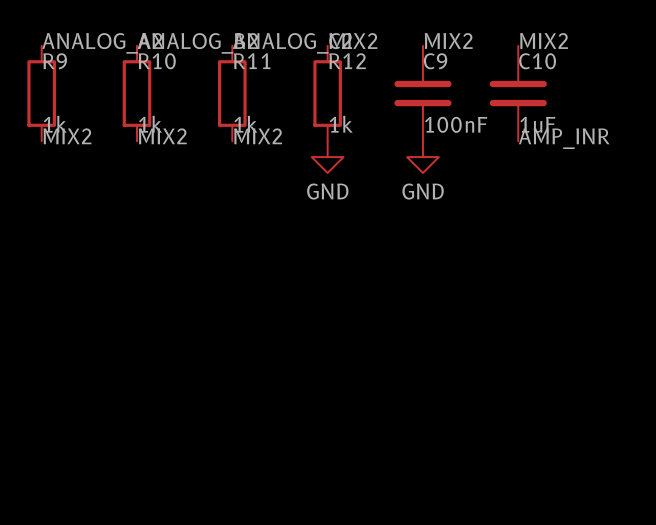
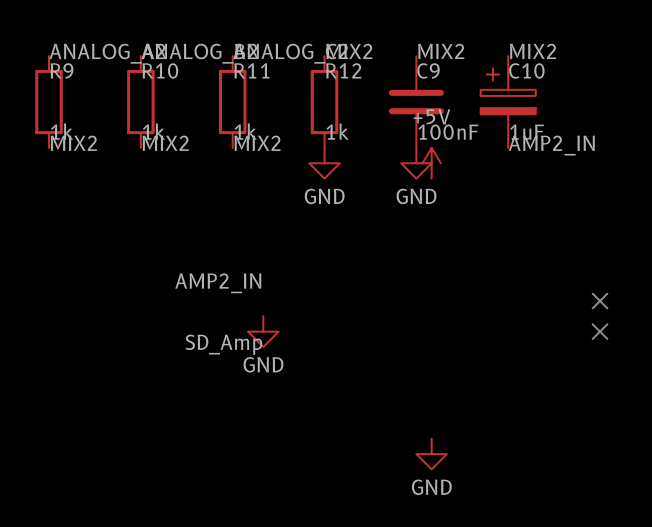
C10 symbol: [489, 45, 547, 142] -> [480, 56, 536, 148]
label: AMP_INR (564, 138) -> AMP2_IN (551, 145)
power symbol: none -> +5V (431, 163)
label: none -> AMP2_IN (218, 283)
no-connect mark: none -> (600, 301)
power symbol: none -> GND (263, 331)
no-connect mark: none -> (600, 331)
label: none -> SD_Amp (223, 344)
power symbol: none -> GND (431, 454)

